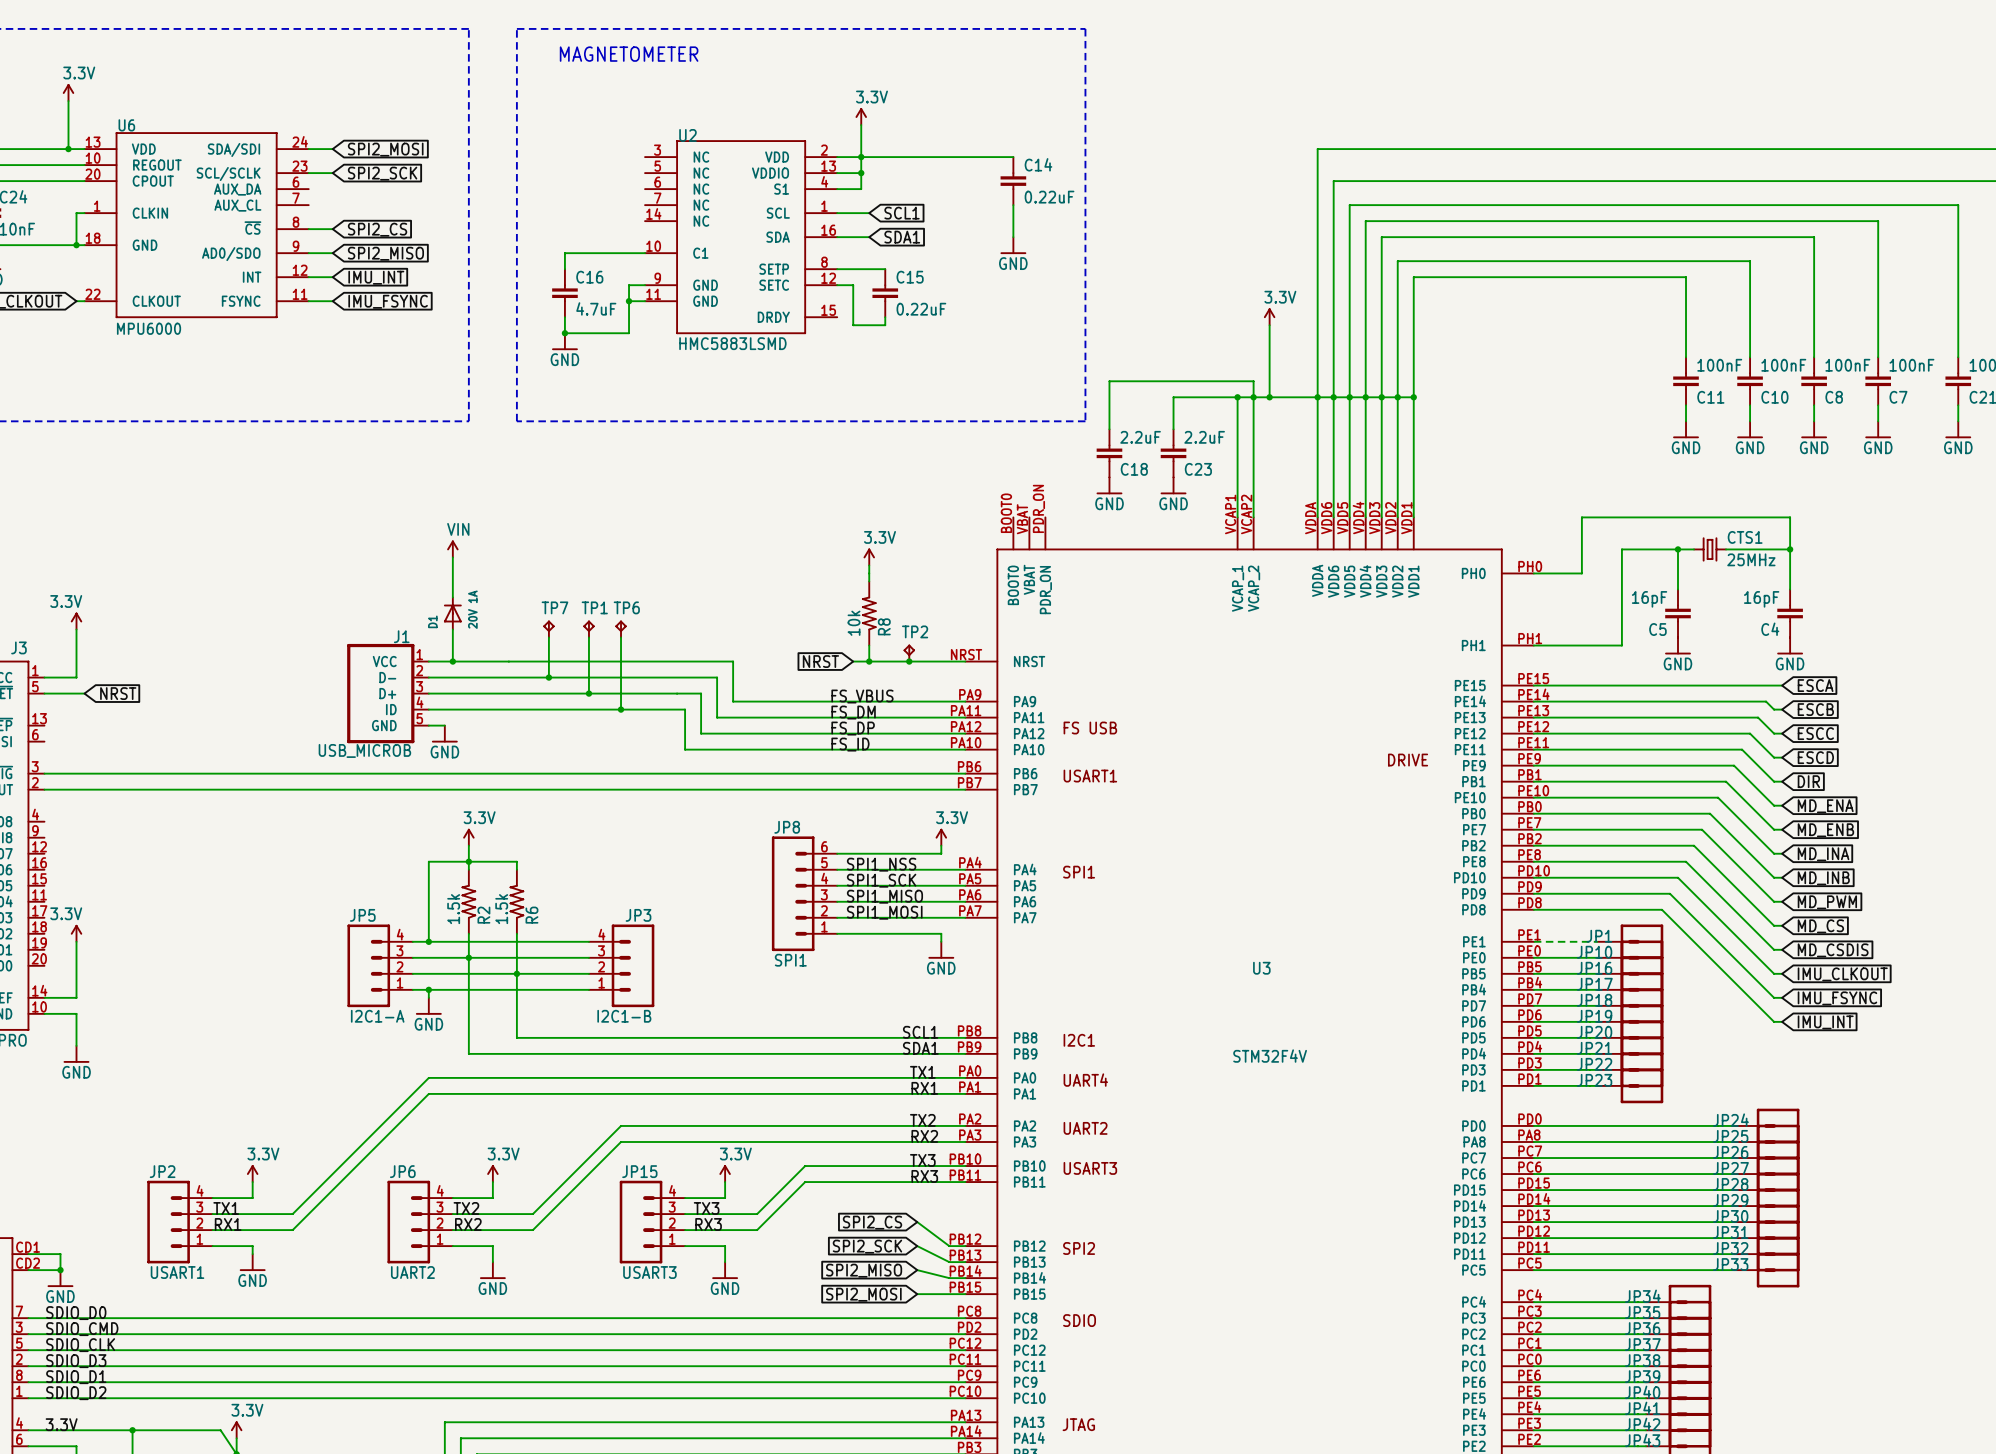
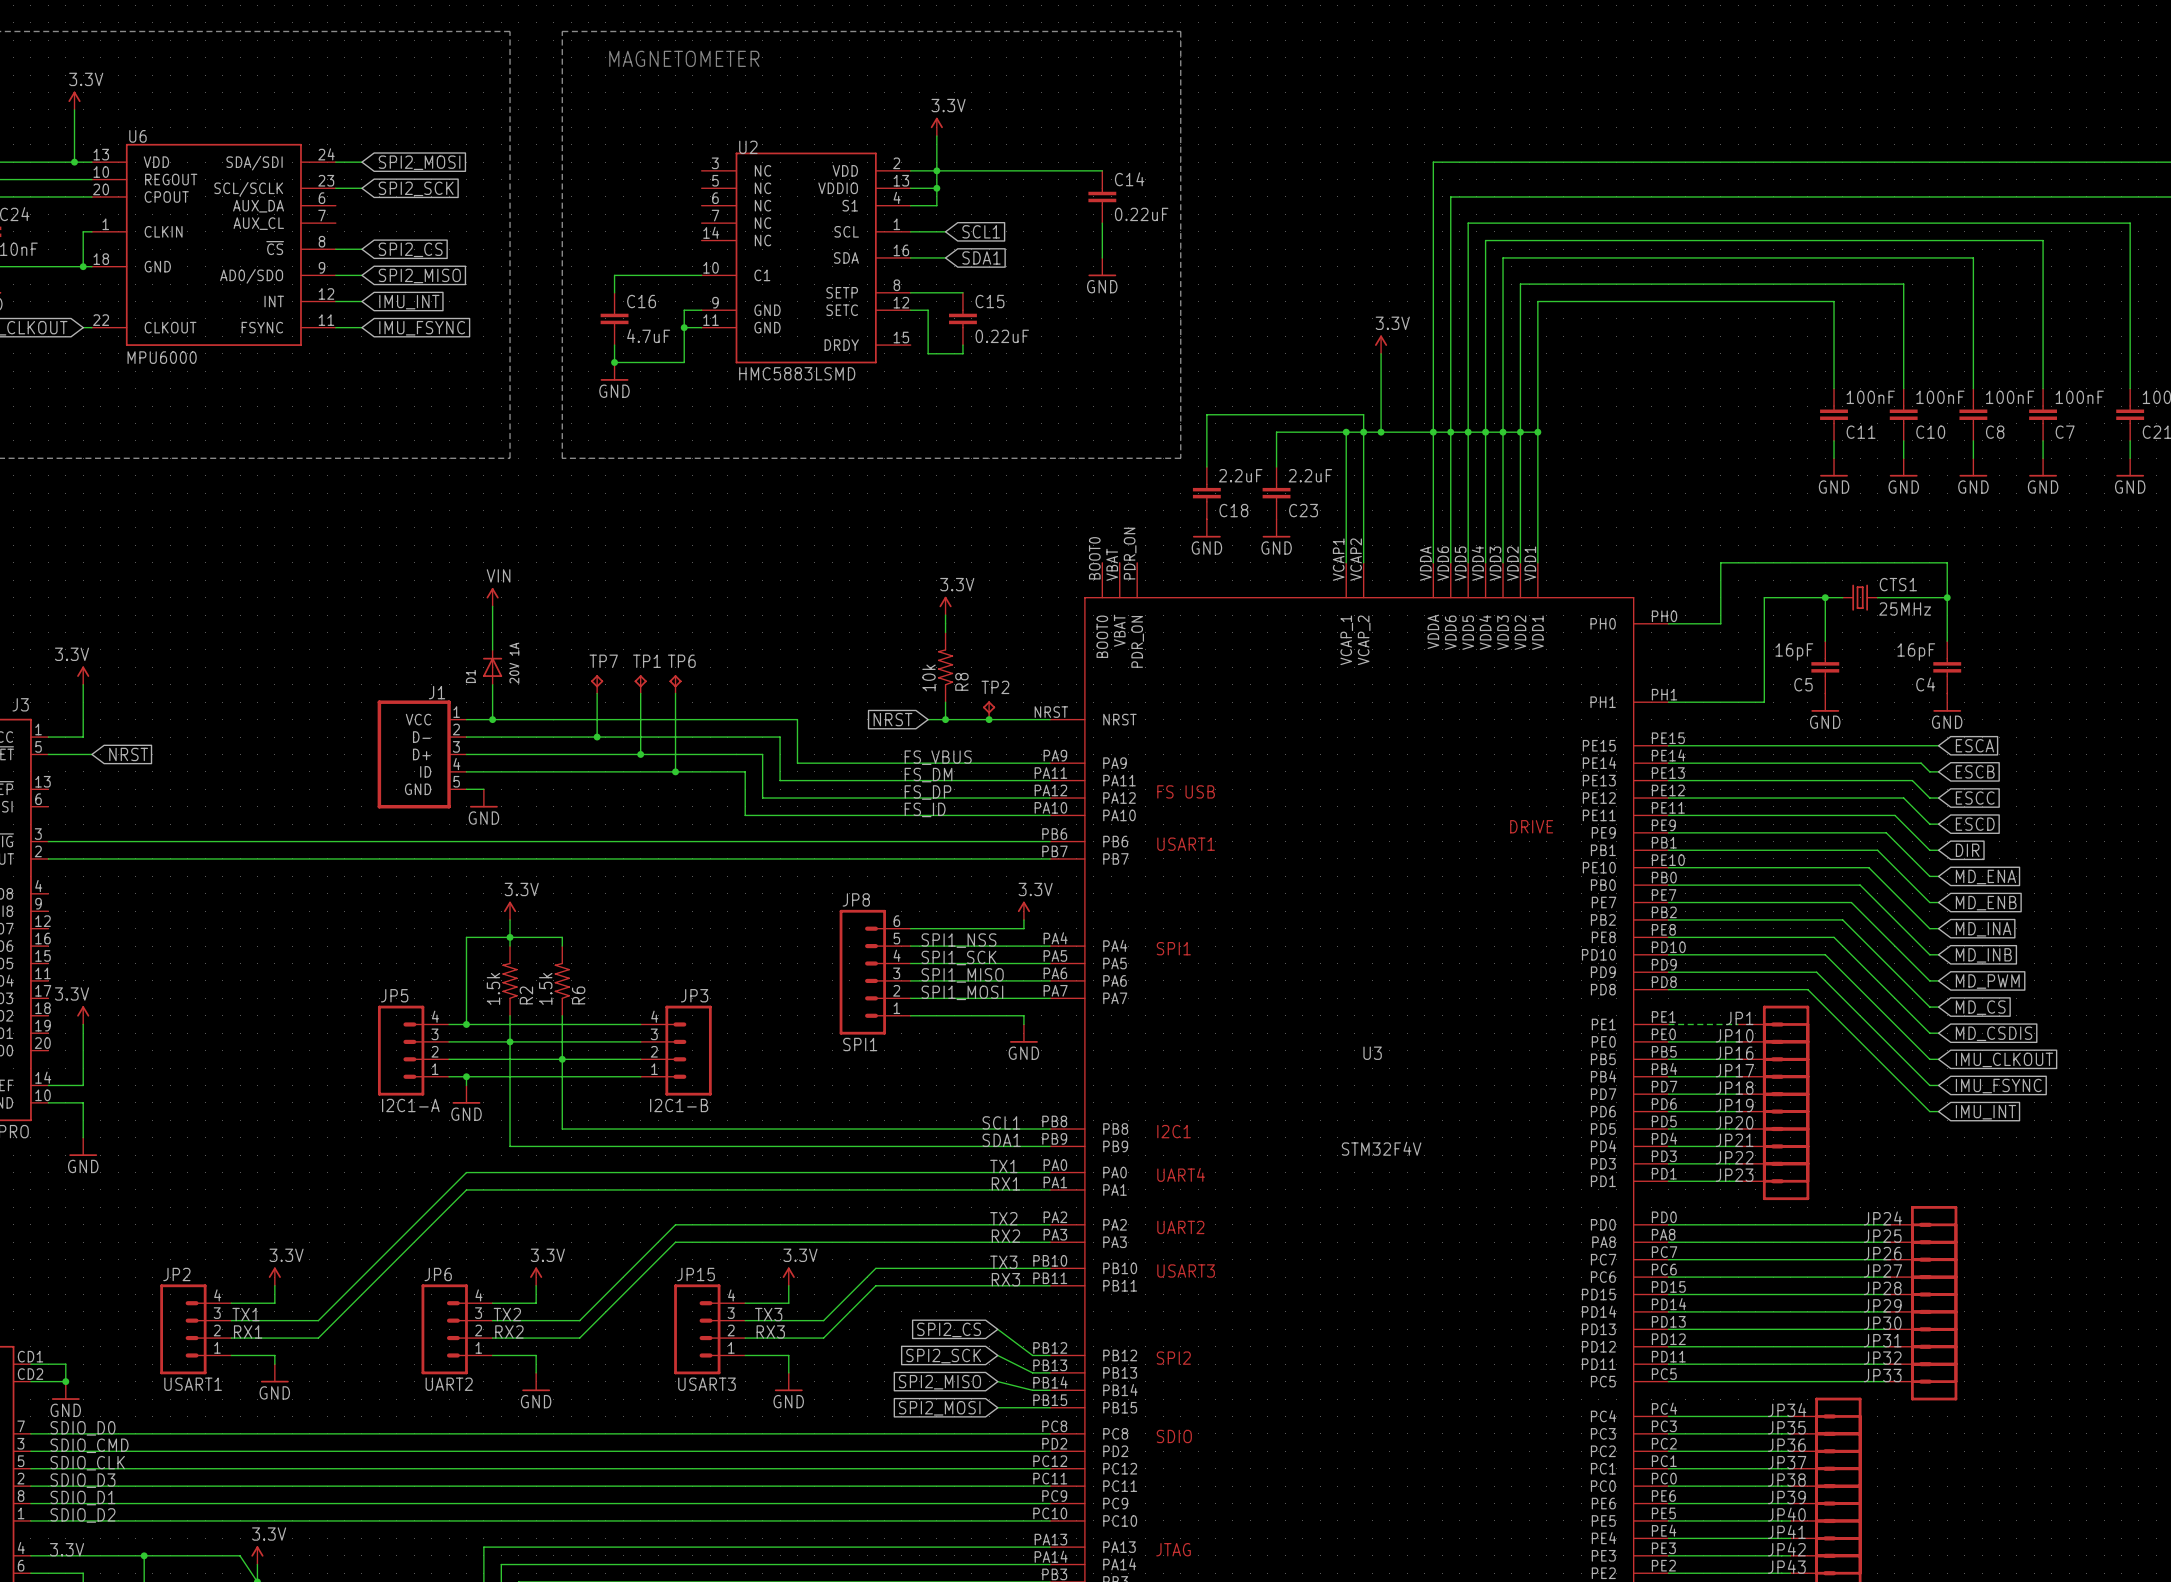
J1 value: USB_MICROB (364, 750) -> none

